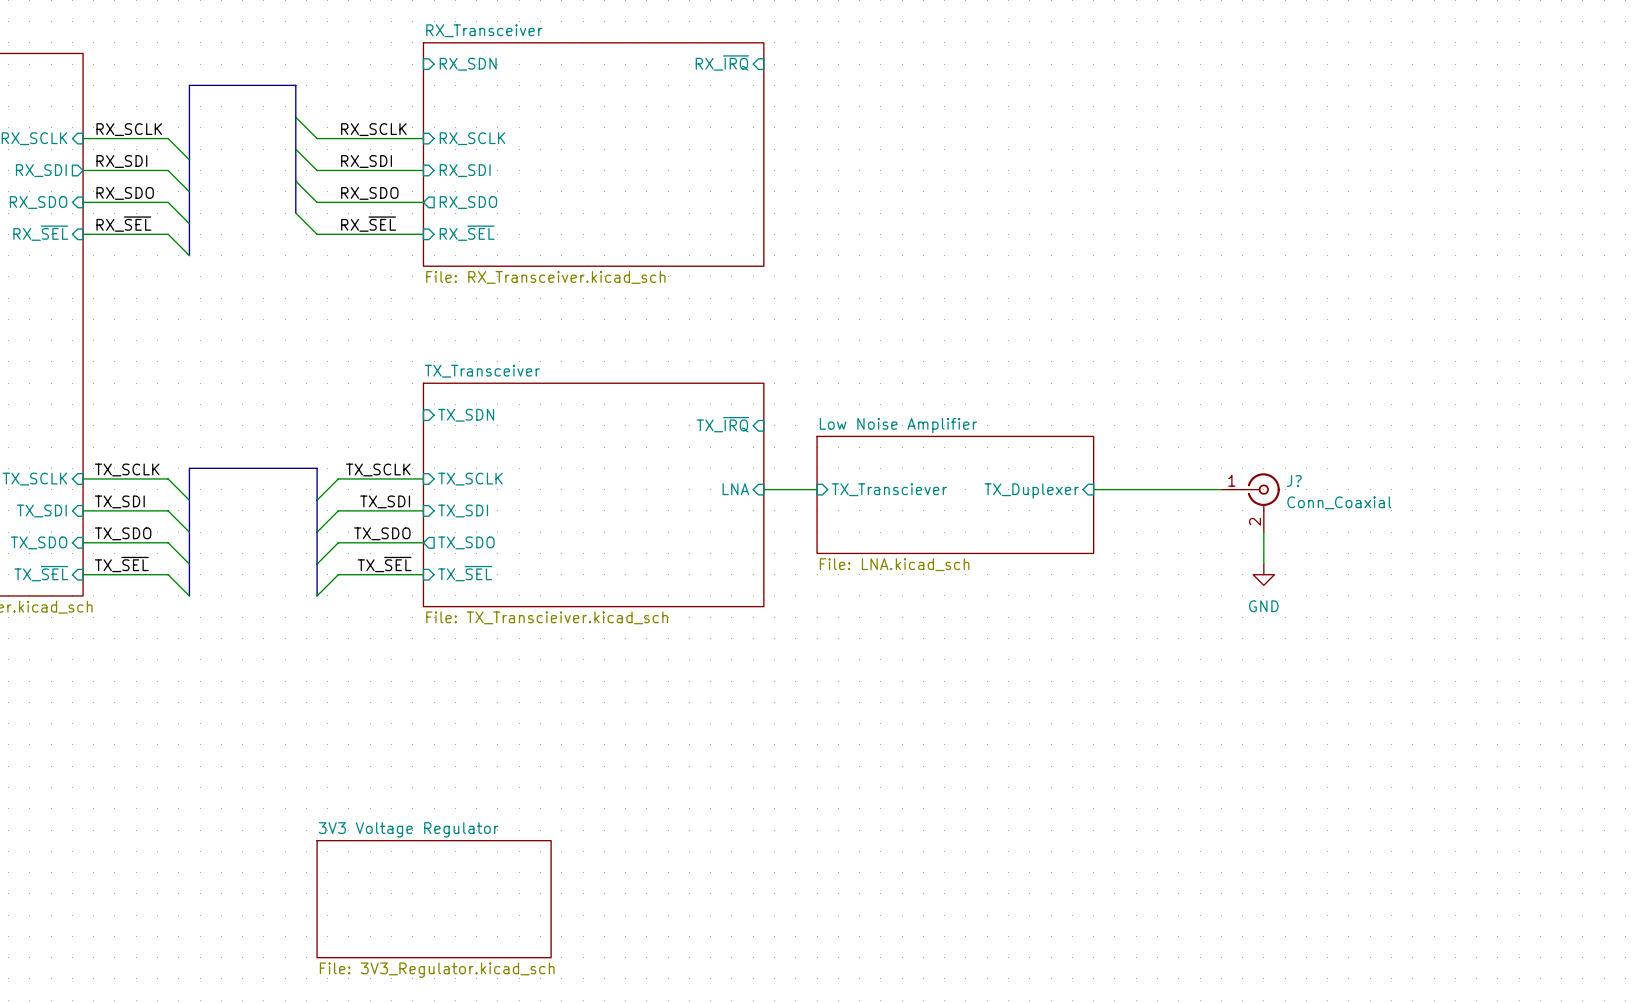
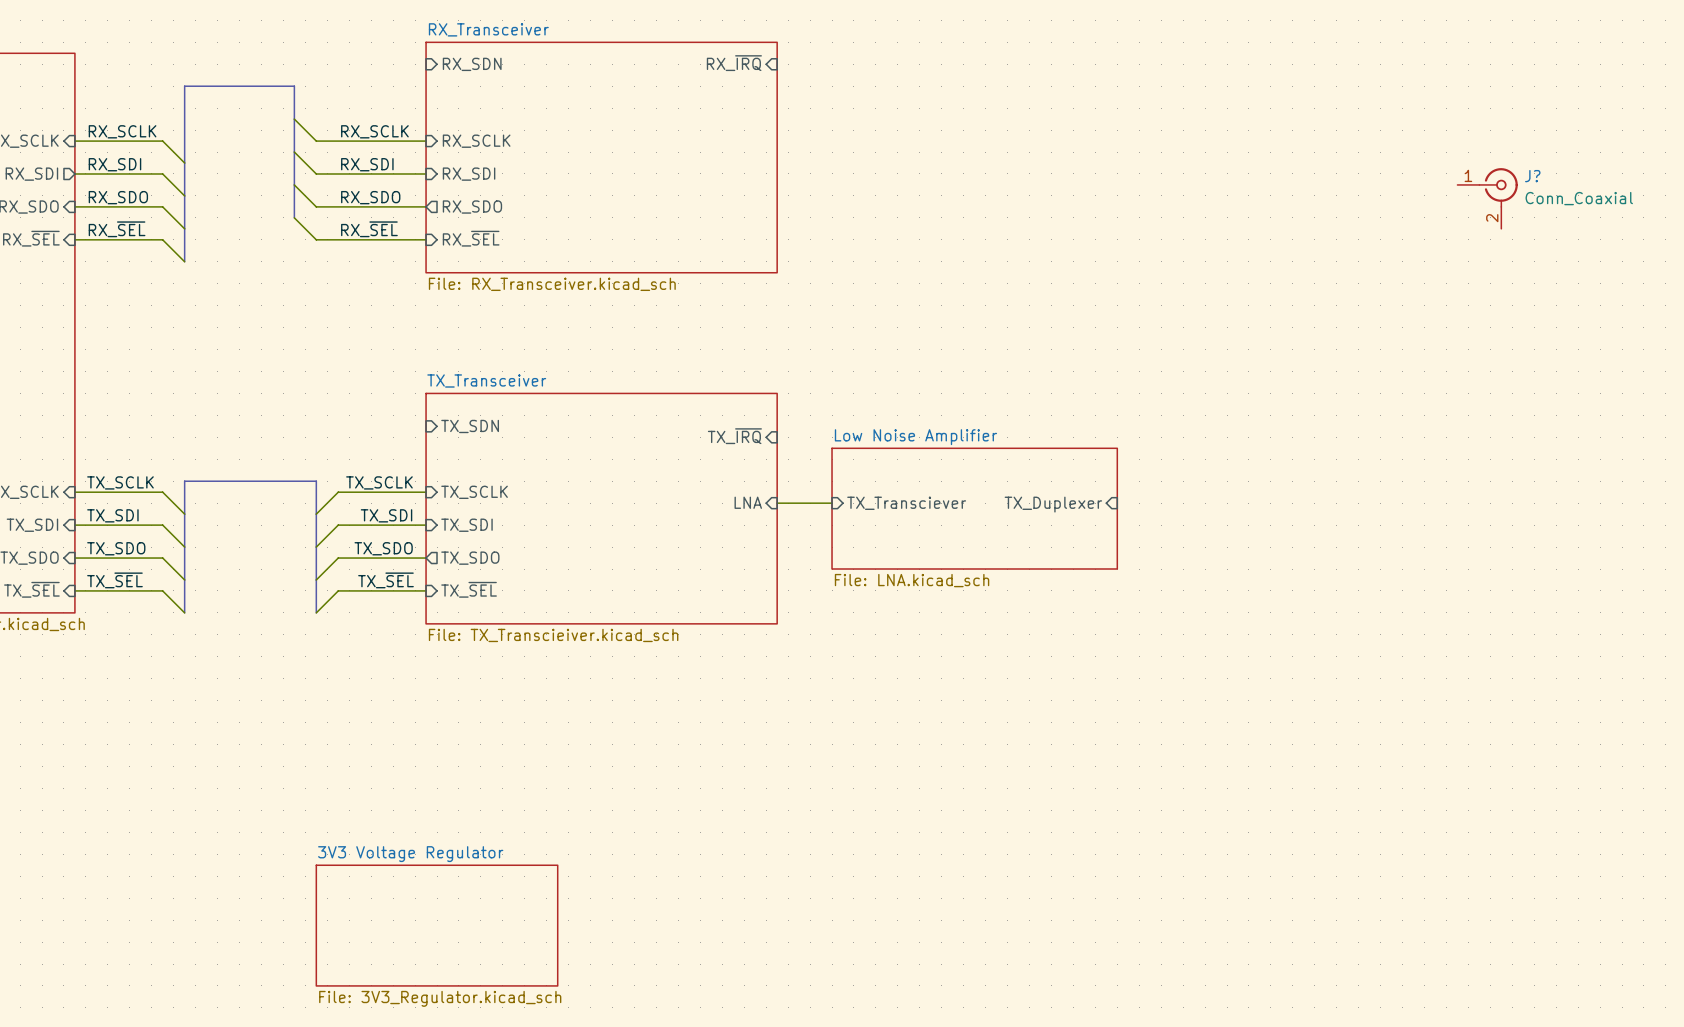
J?: none -> Conn_Coaxial (1487, 198)
wire: (1093, 489) (1221, 489) -> none
J?: Conn_Coaxial (1250, 502) -> none
wire: (1263, 532) (1263, 564) -> none
power symbol: GND (1263, 574) -> none

